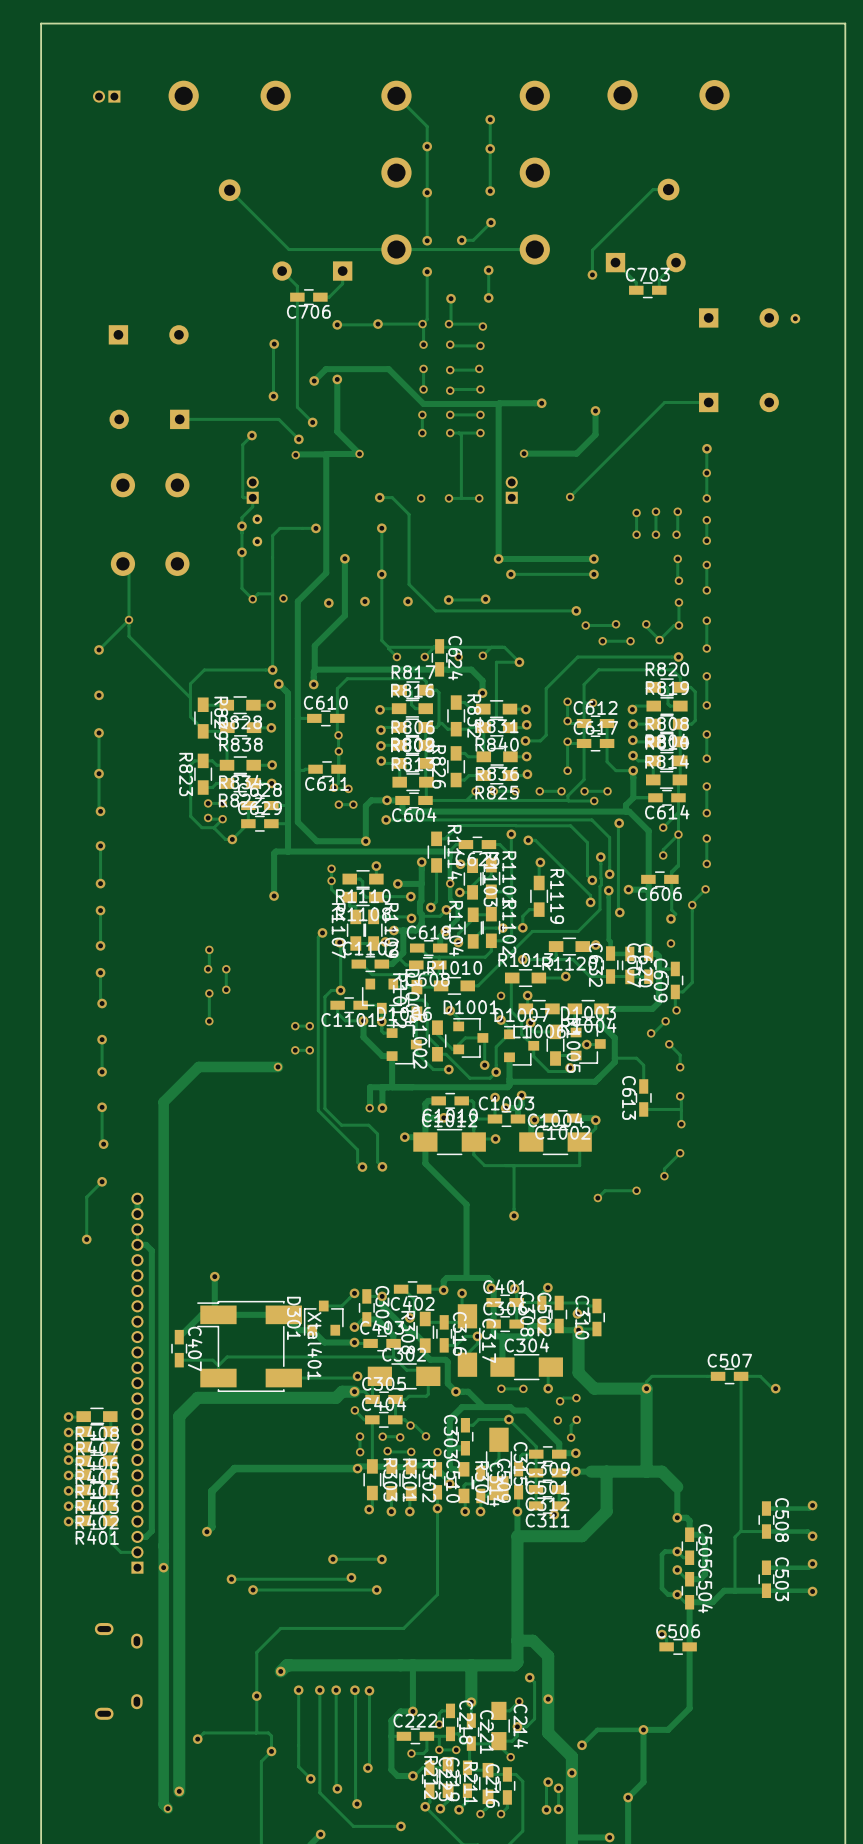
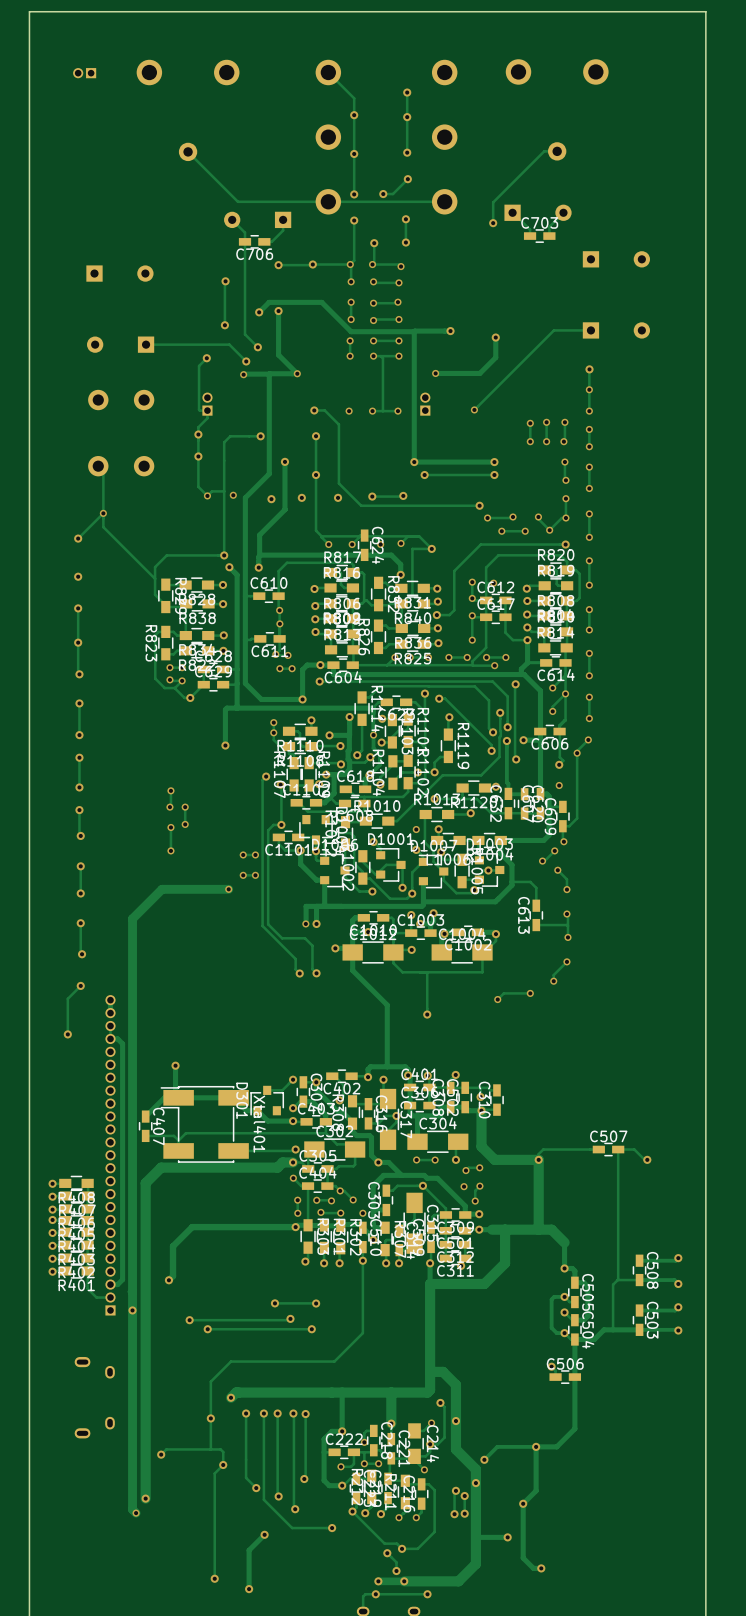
part: (795, 318) -> none
part: (257, 519) -> none
part: (257, 541) -> none

